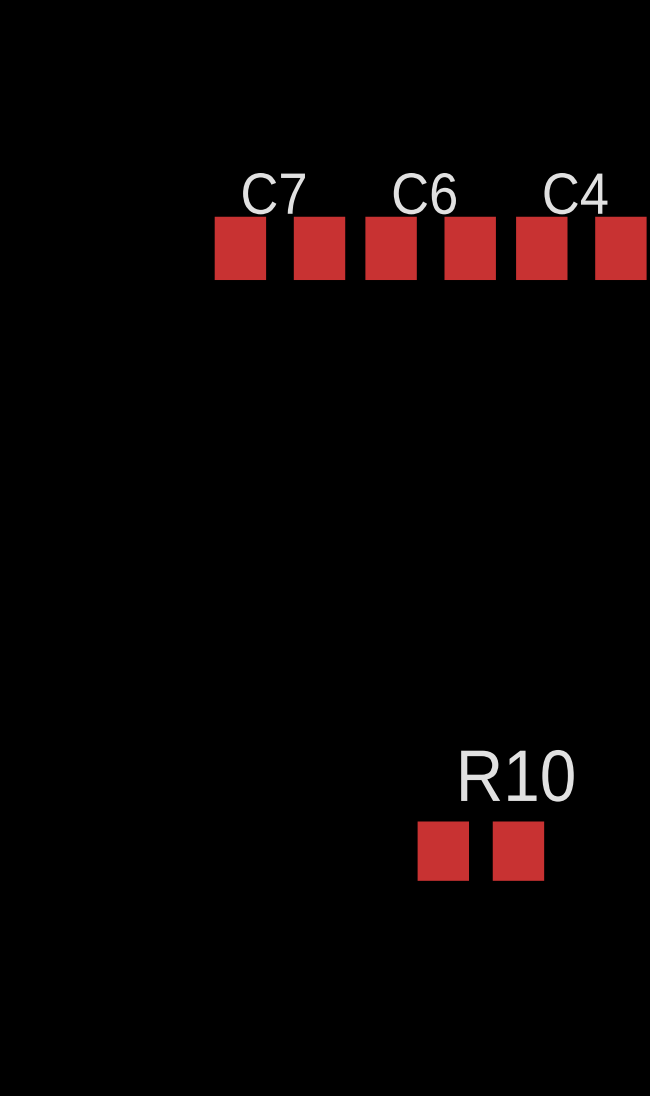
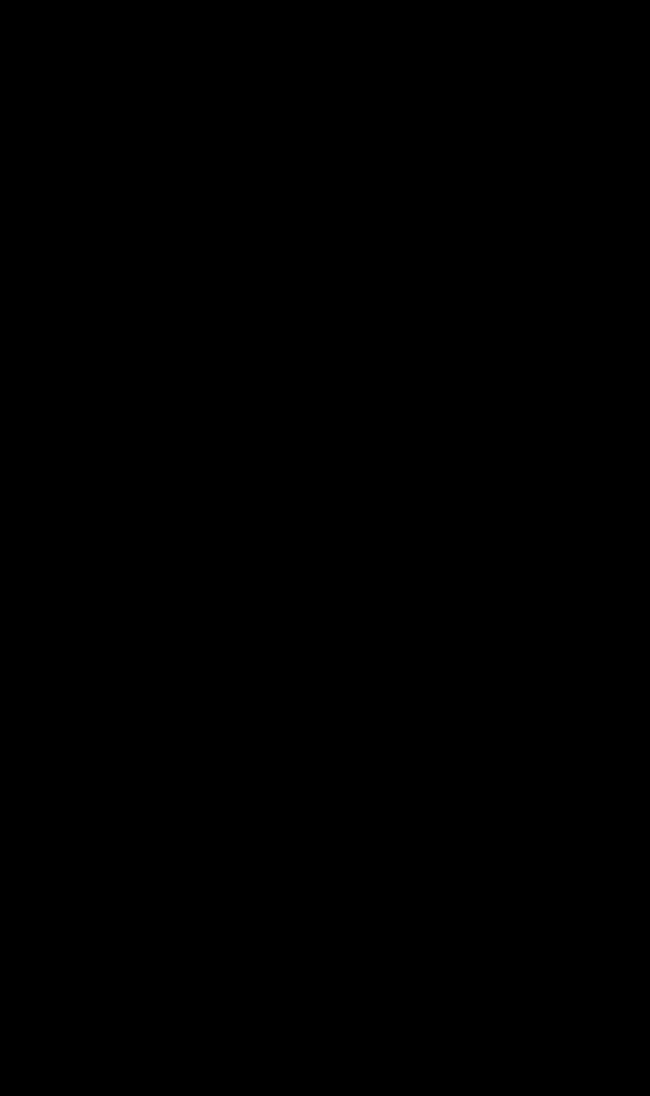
C7: (279, 248) -> none
C6: (430, 248) -> none
C4: (581, 248) -> none
R10: (480, 851) -> none

